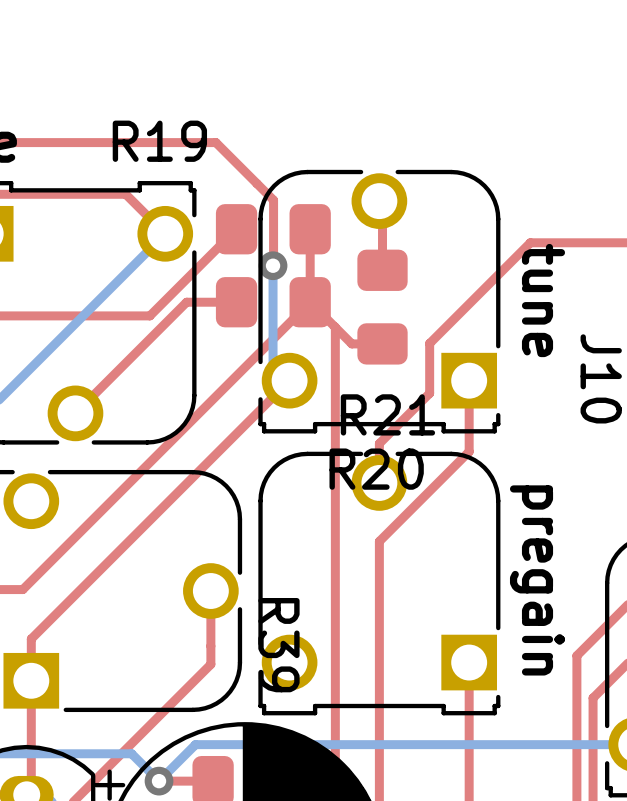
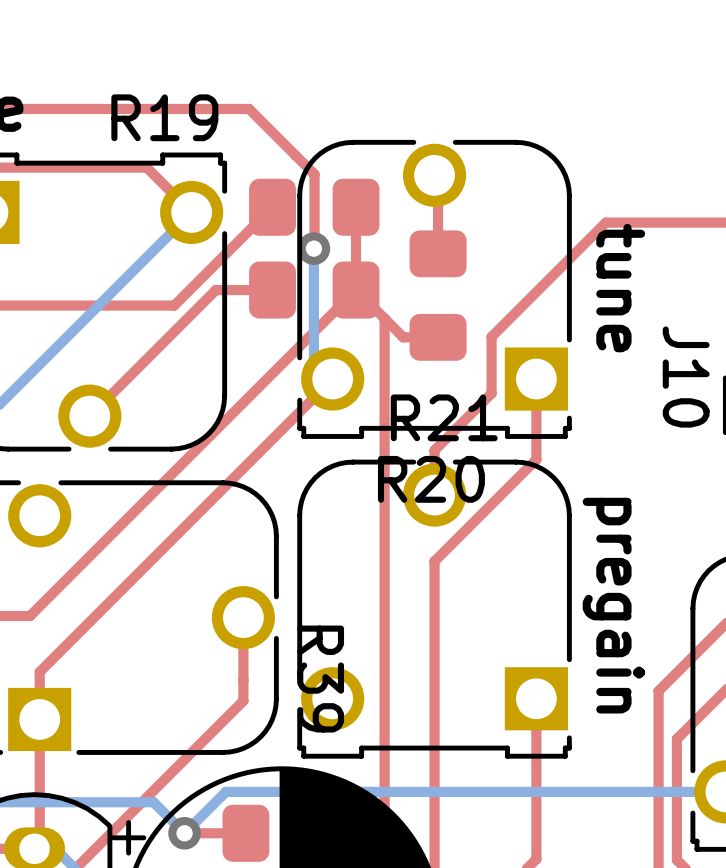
R19 name position: R19 (159, 141) -> R19 (164, 117)

